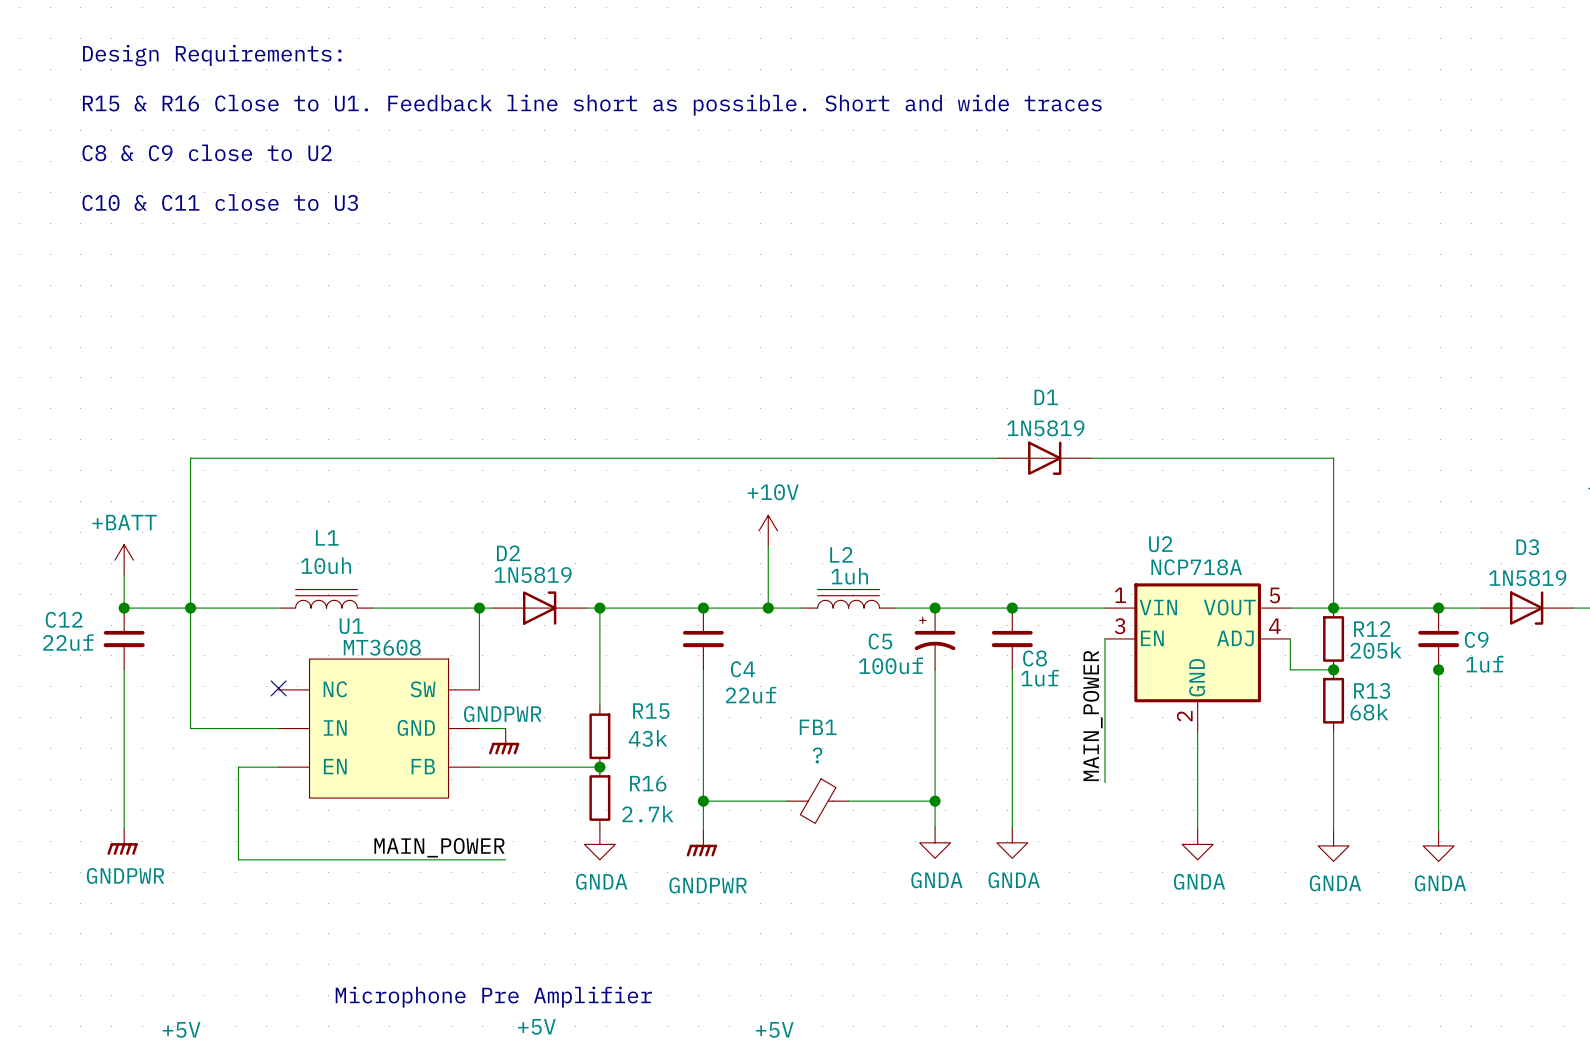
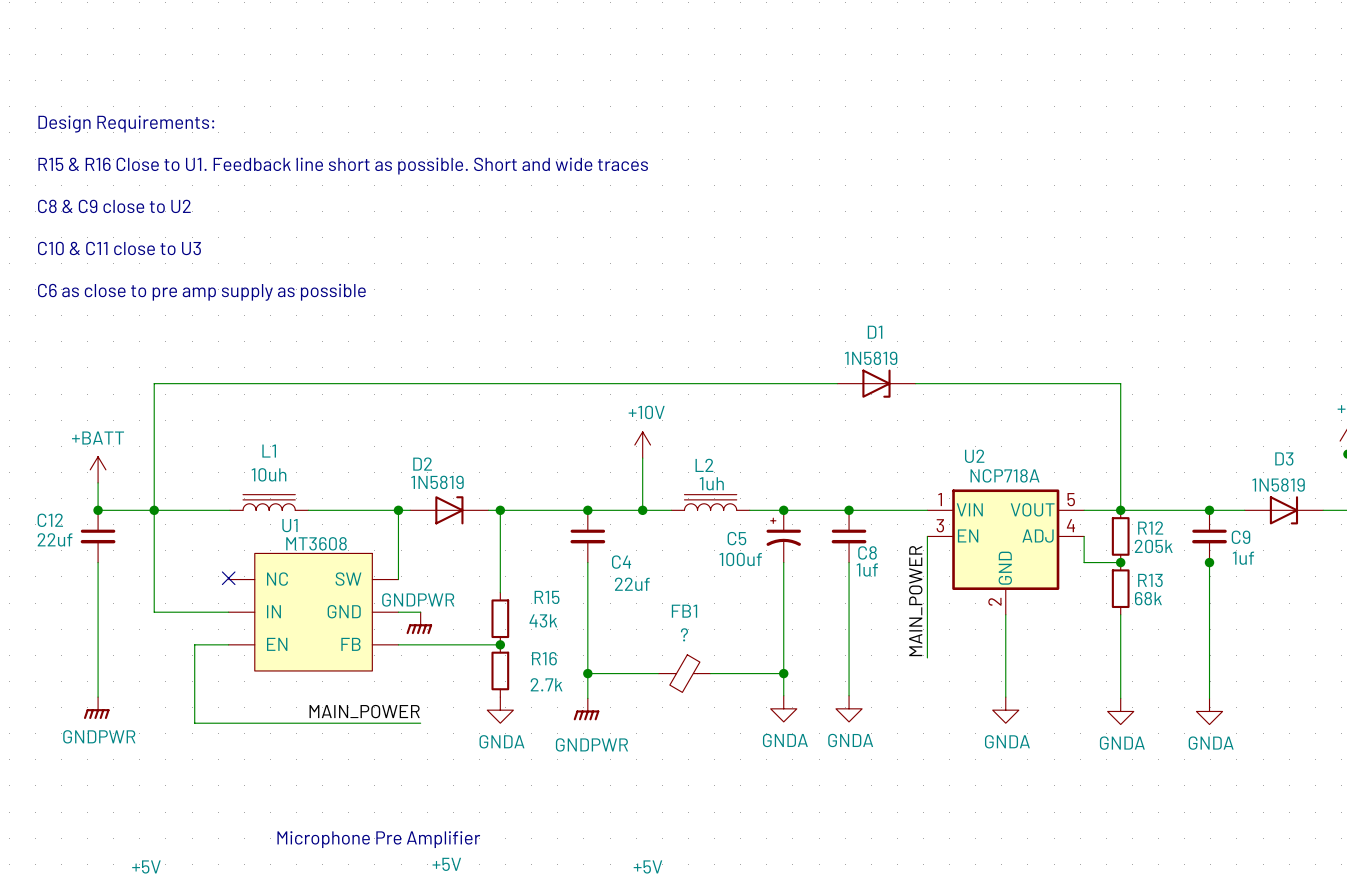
text position: Design Requirements: (212, 55) -> Design Requirements: (126, 124)
text position: R15 & R16 Close to U1. Feedback line short as possible. Short and wide traces (592, 105) -> R15 & R16 Close to U1. Feedback line short as possible. Short and wide traces (343, 166)
text position: C8 & C9 close to U2 (207, 152) -> C8 & C9 close to U2 (114, 206)
text position: C10 & C11 close to U3 (220, 202) -> C10 & C11 close to U3 (119, 248)
text: none -> C6 as close to pre amp supply as possible (201, 292)

